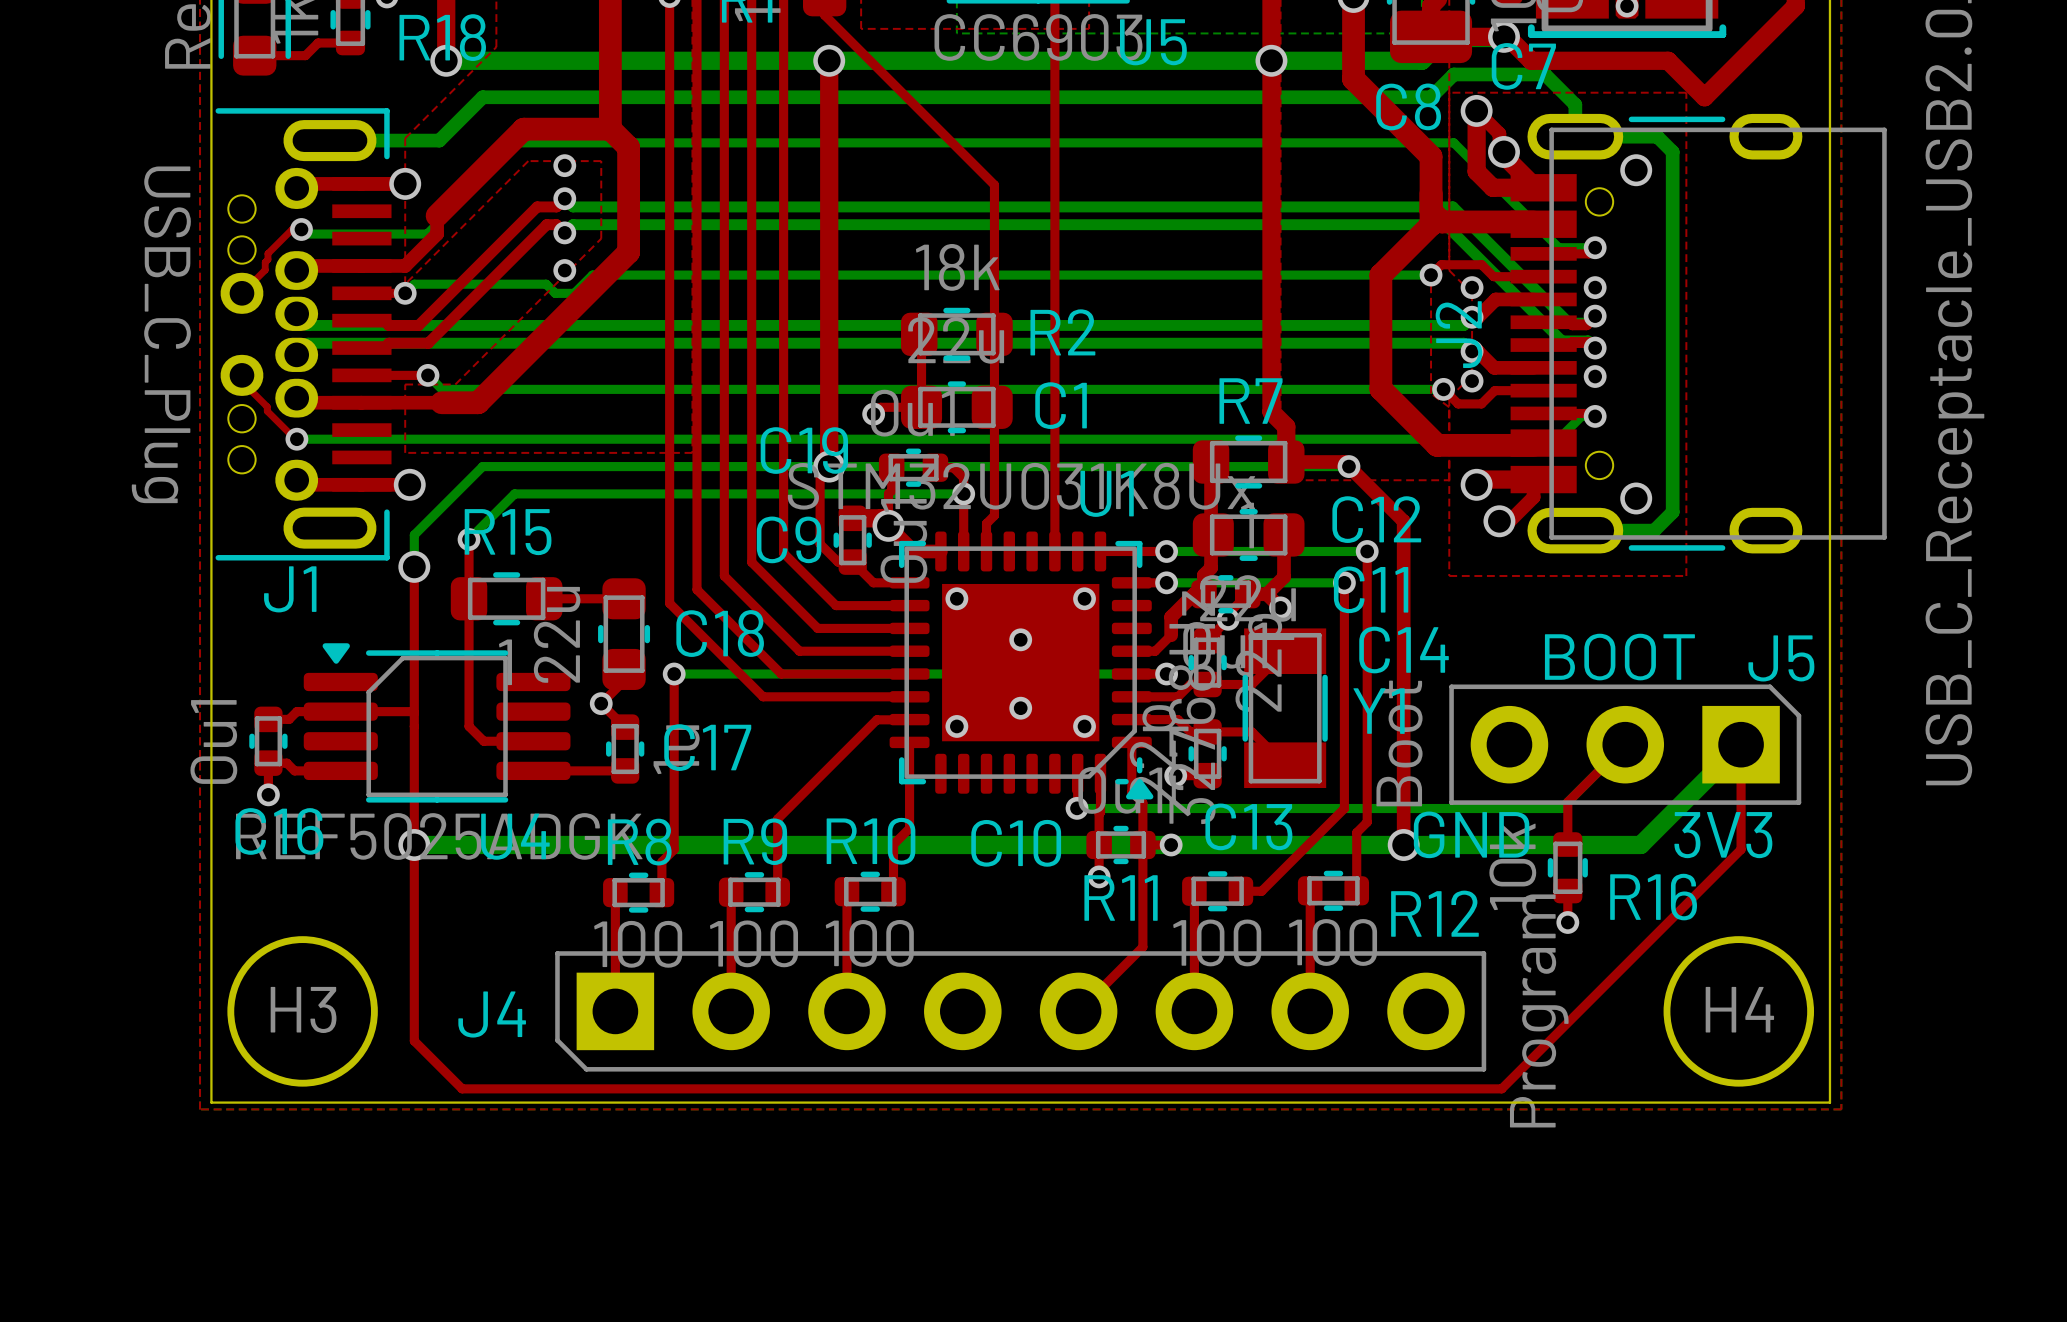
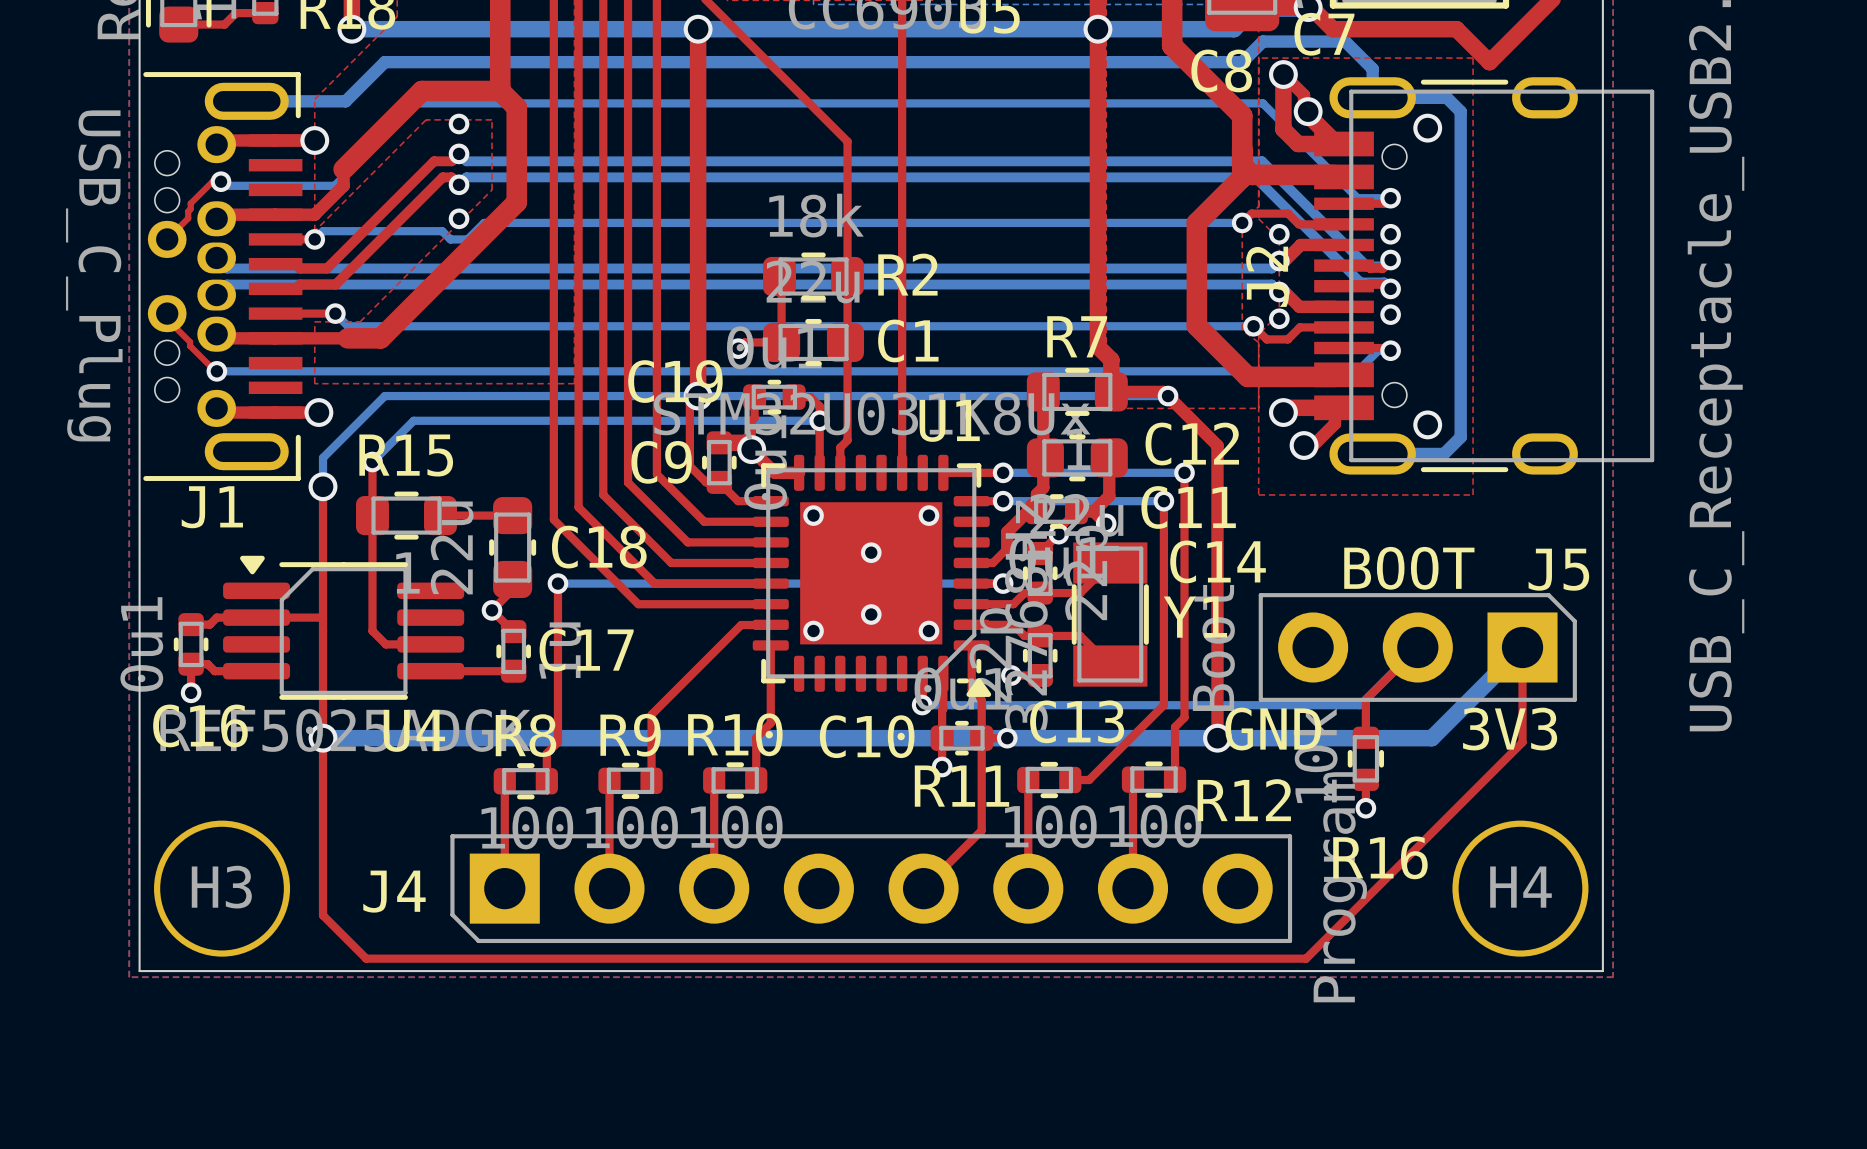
R16 name position: R16 (1653, 897) -> R16 (1380, 857)

